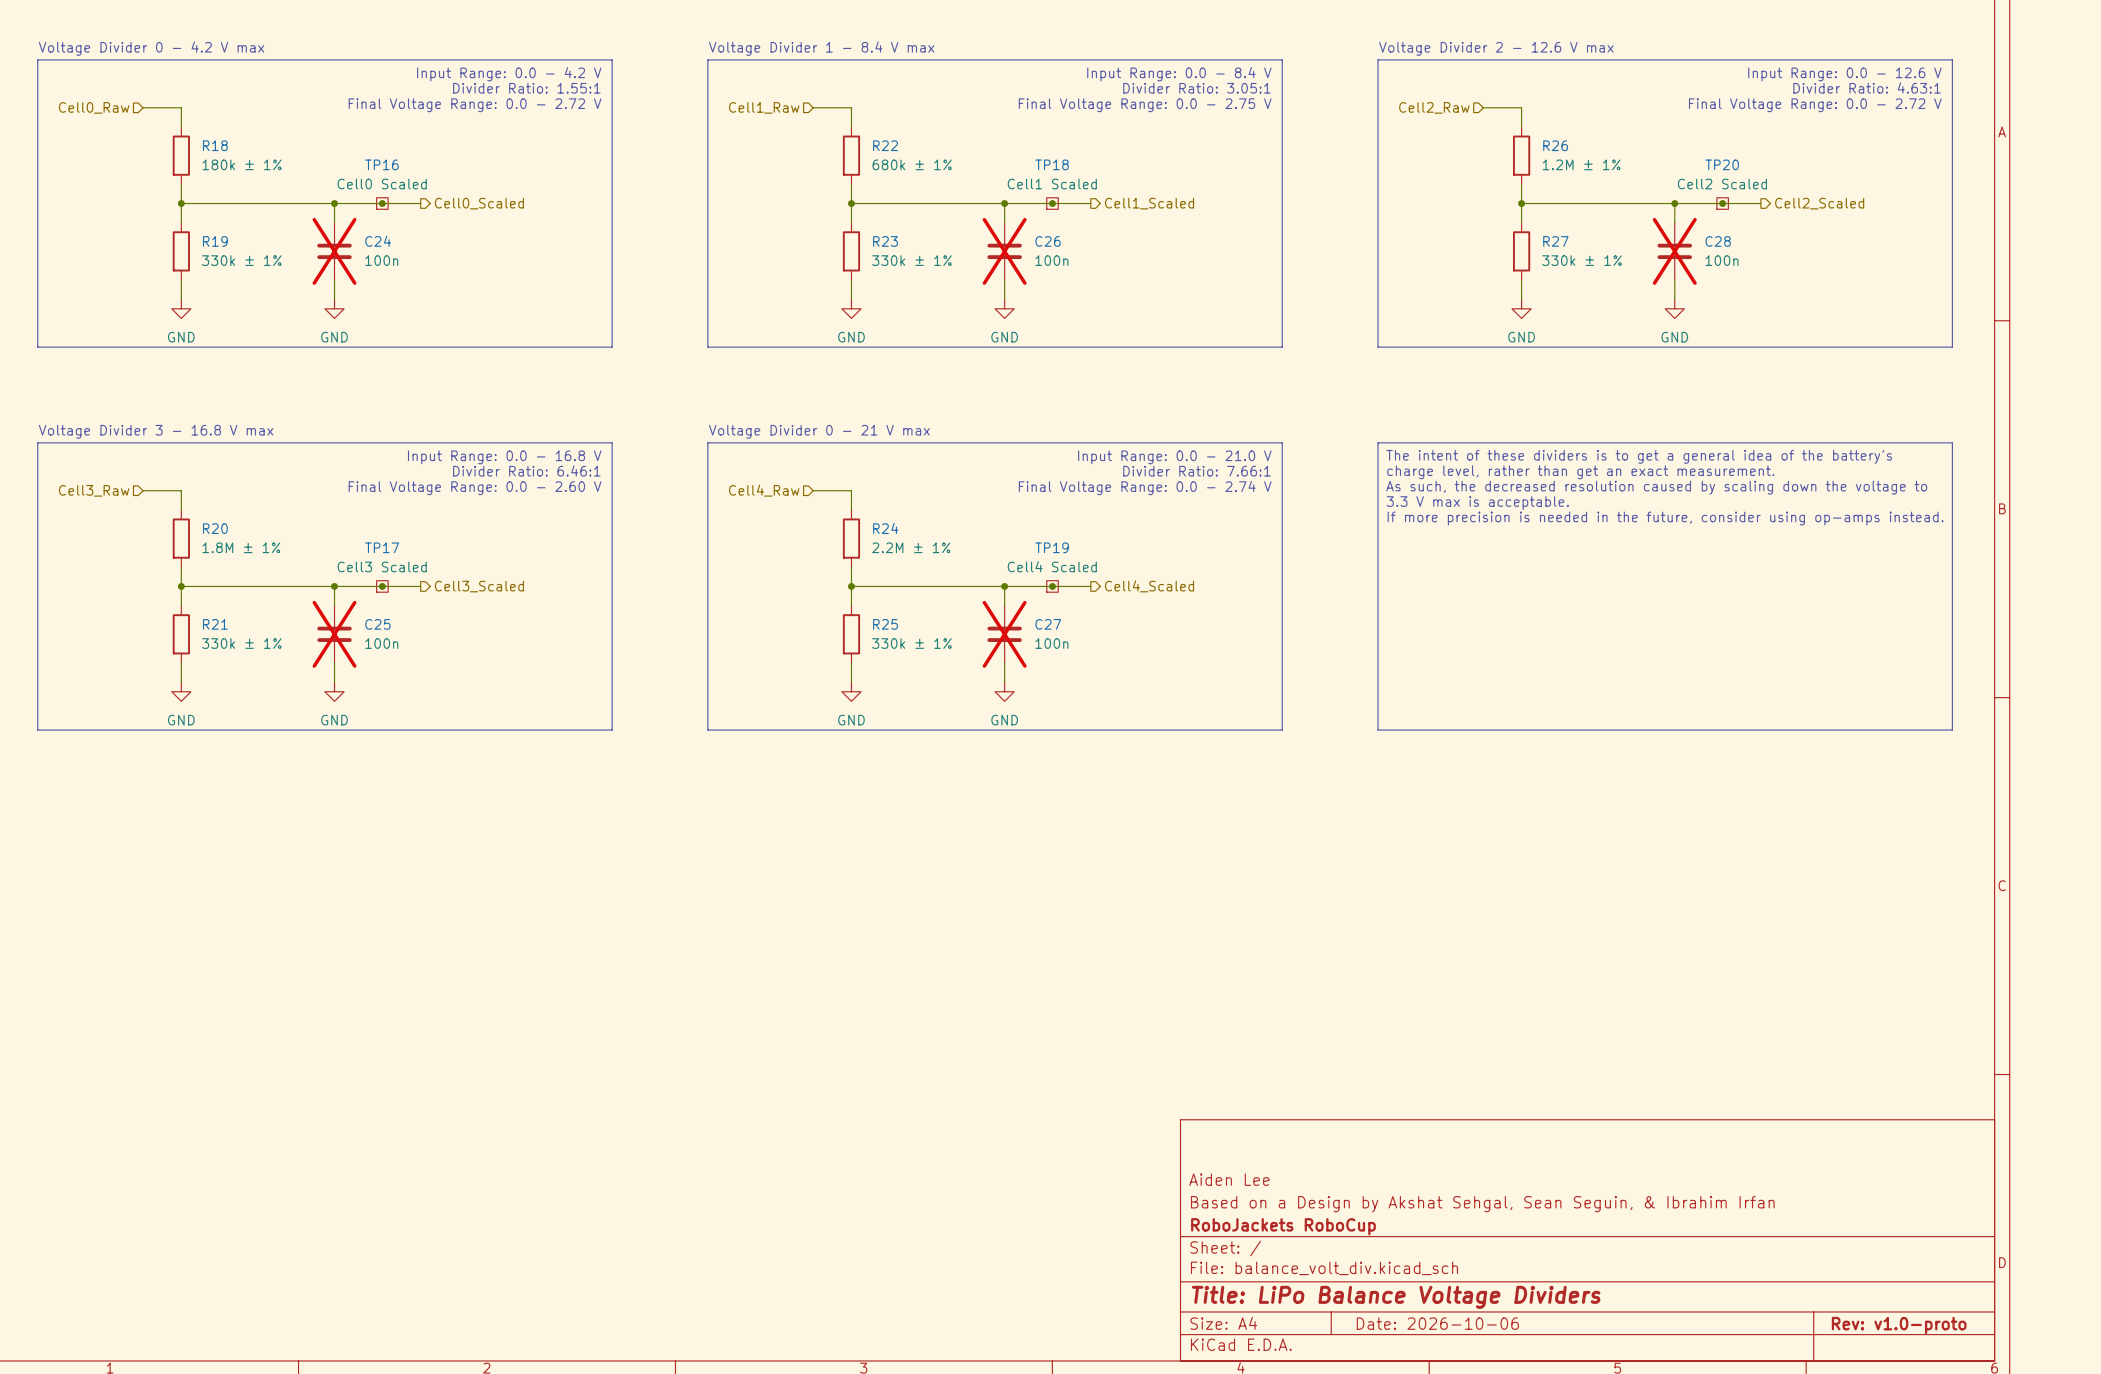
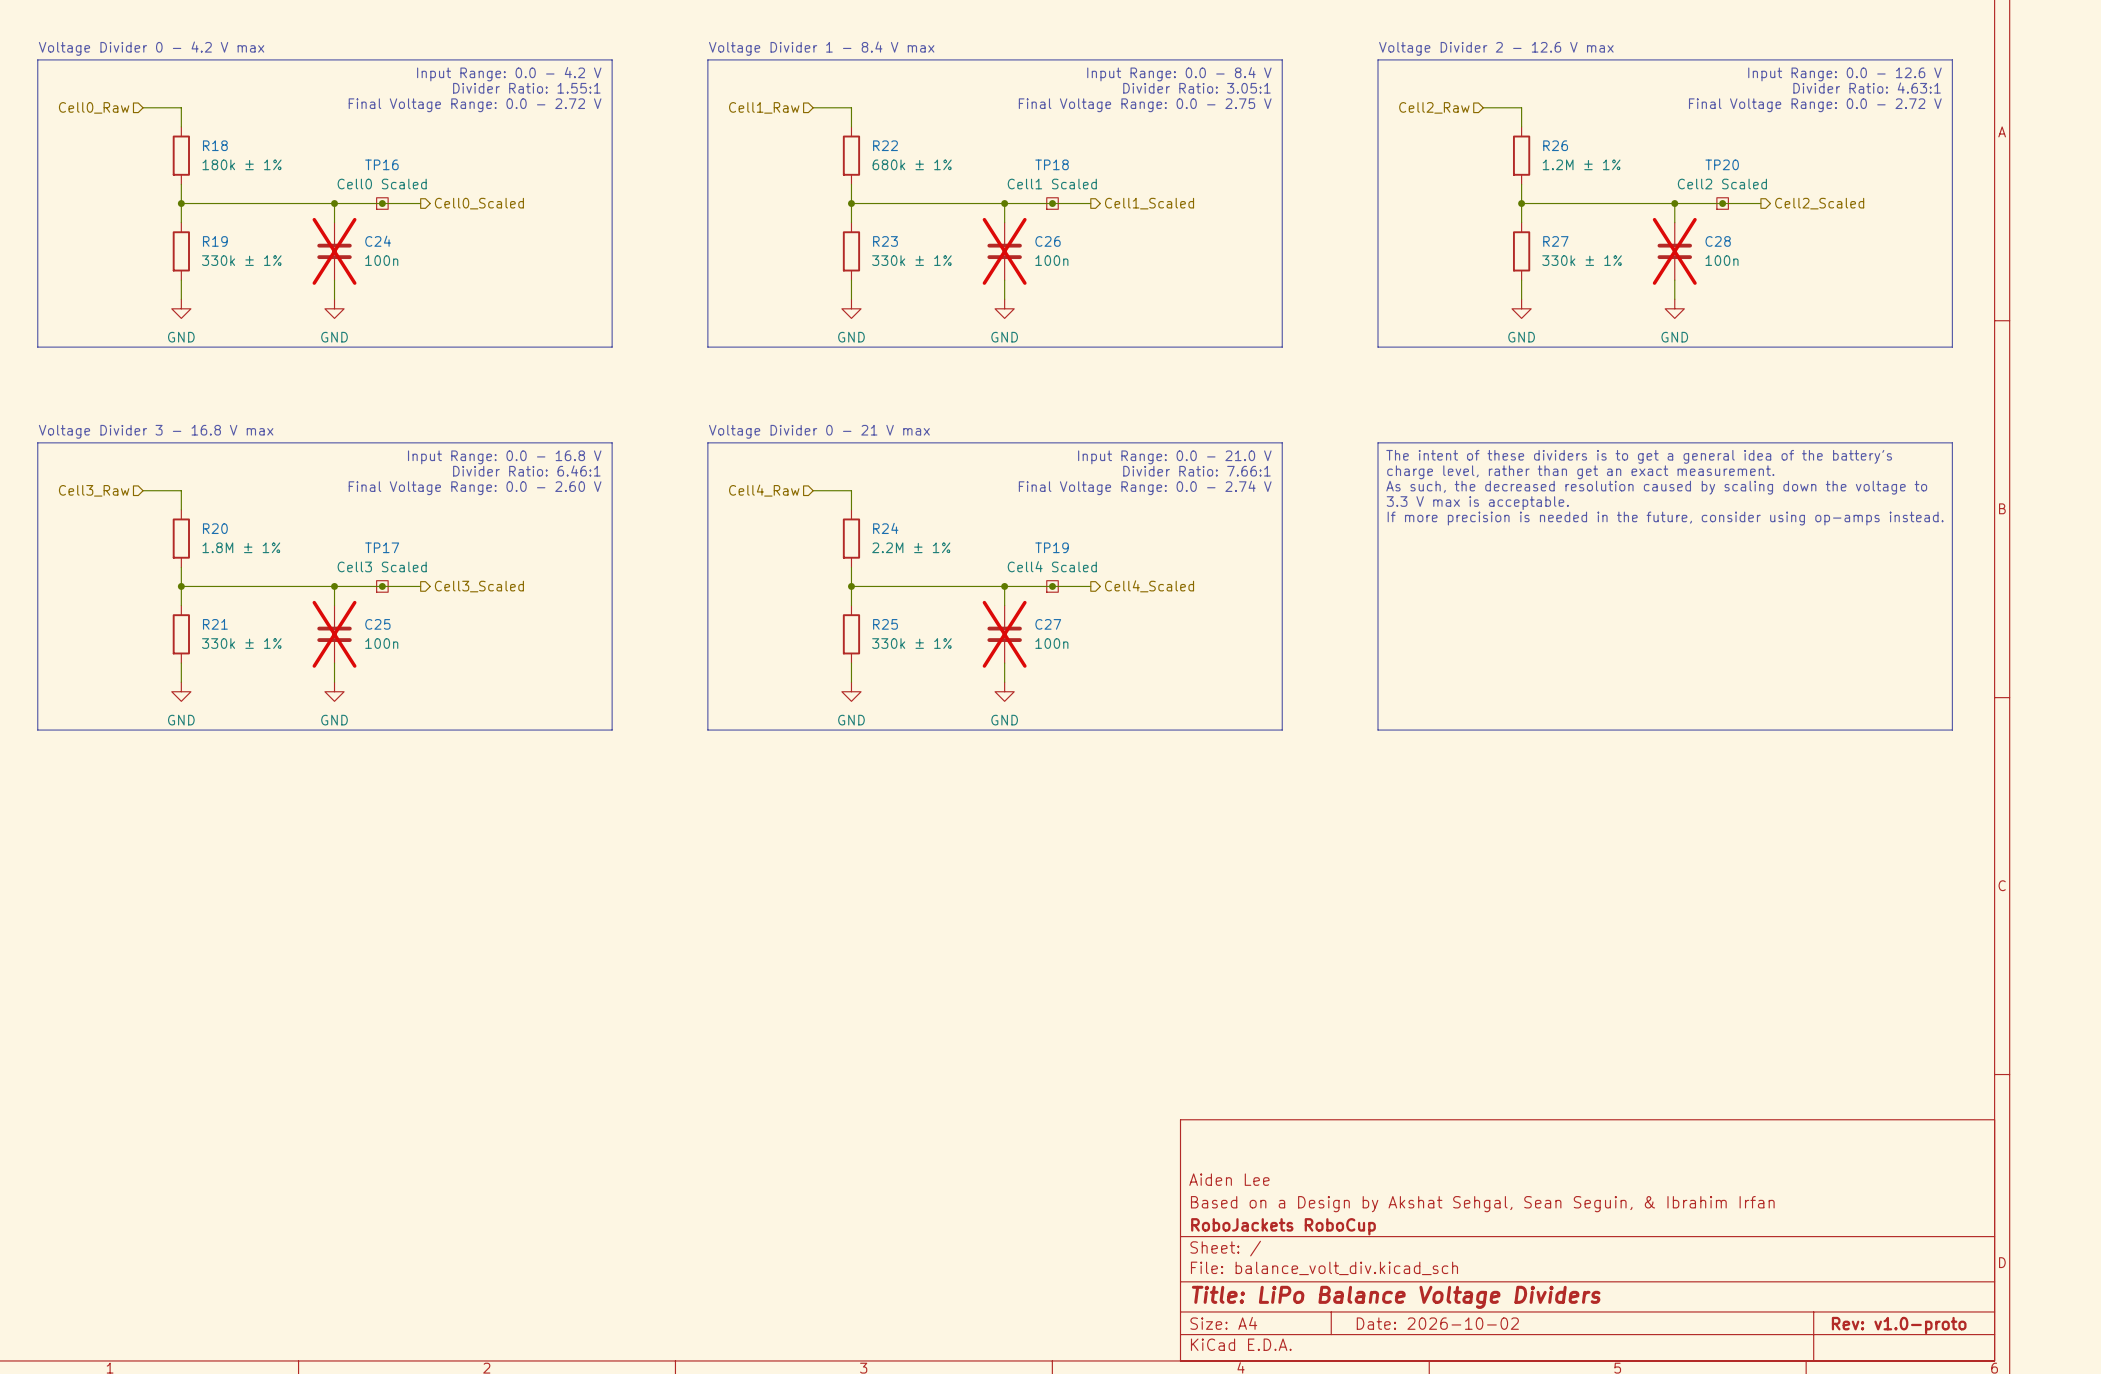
title block: Date: 2026-10-06 (1437, 1323) -> Date: 2026-10-02 (1437, 1323)

